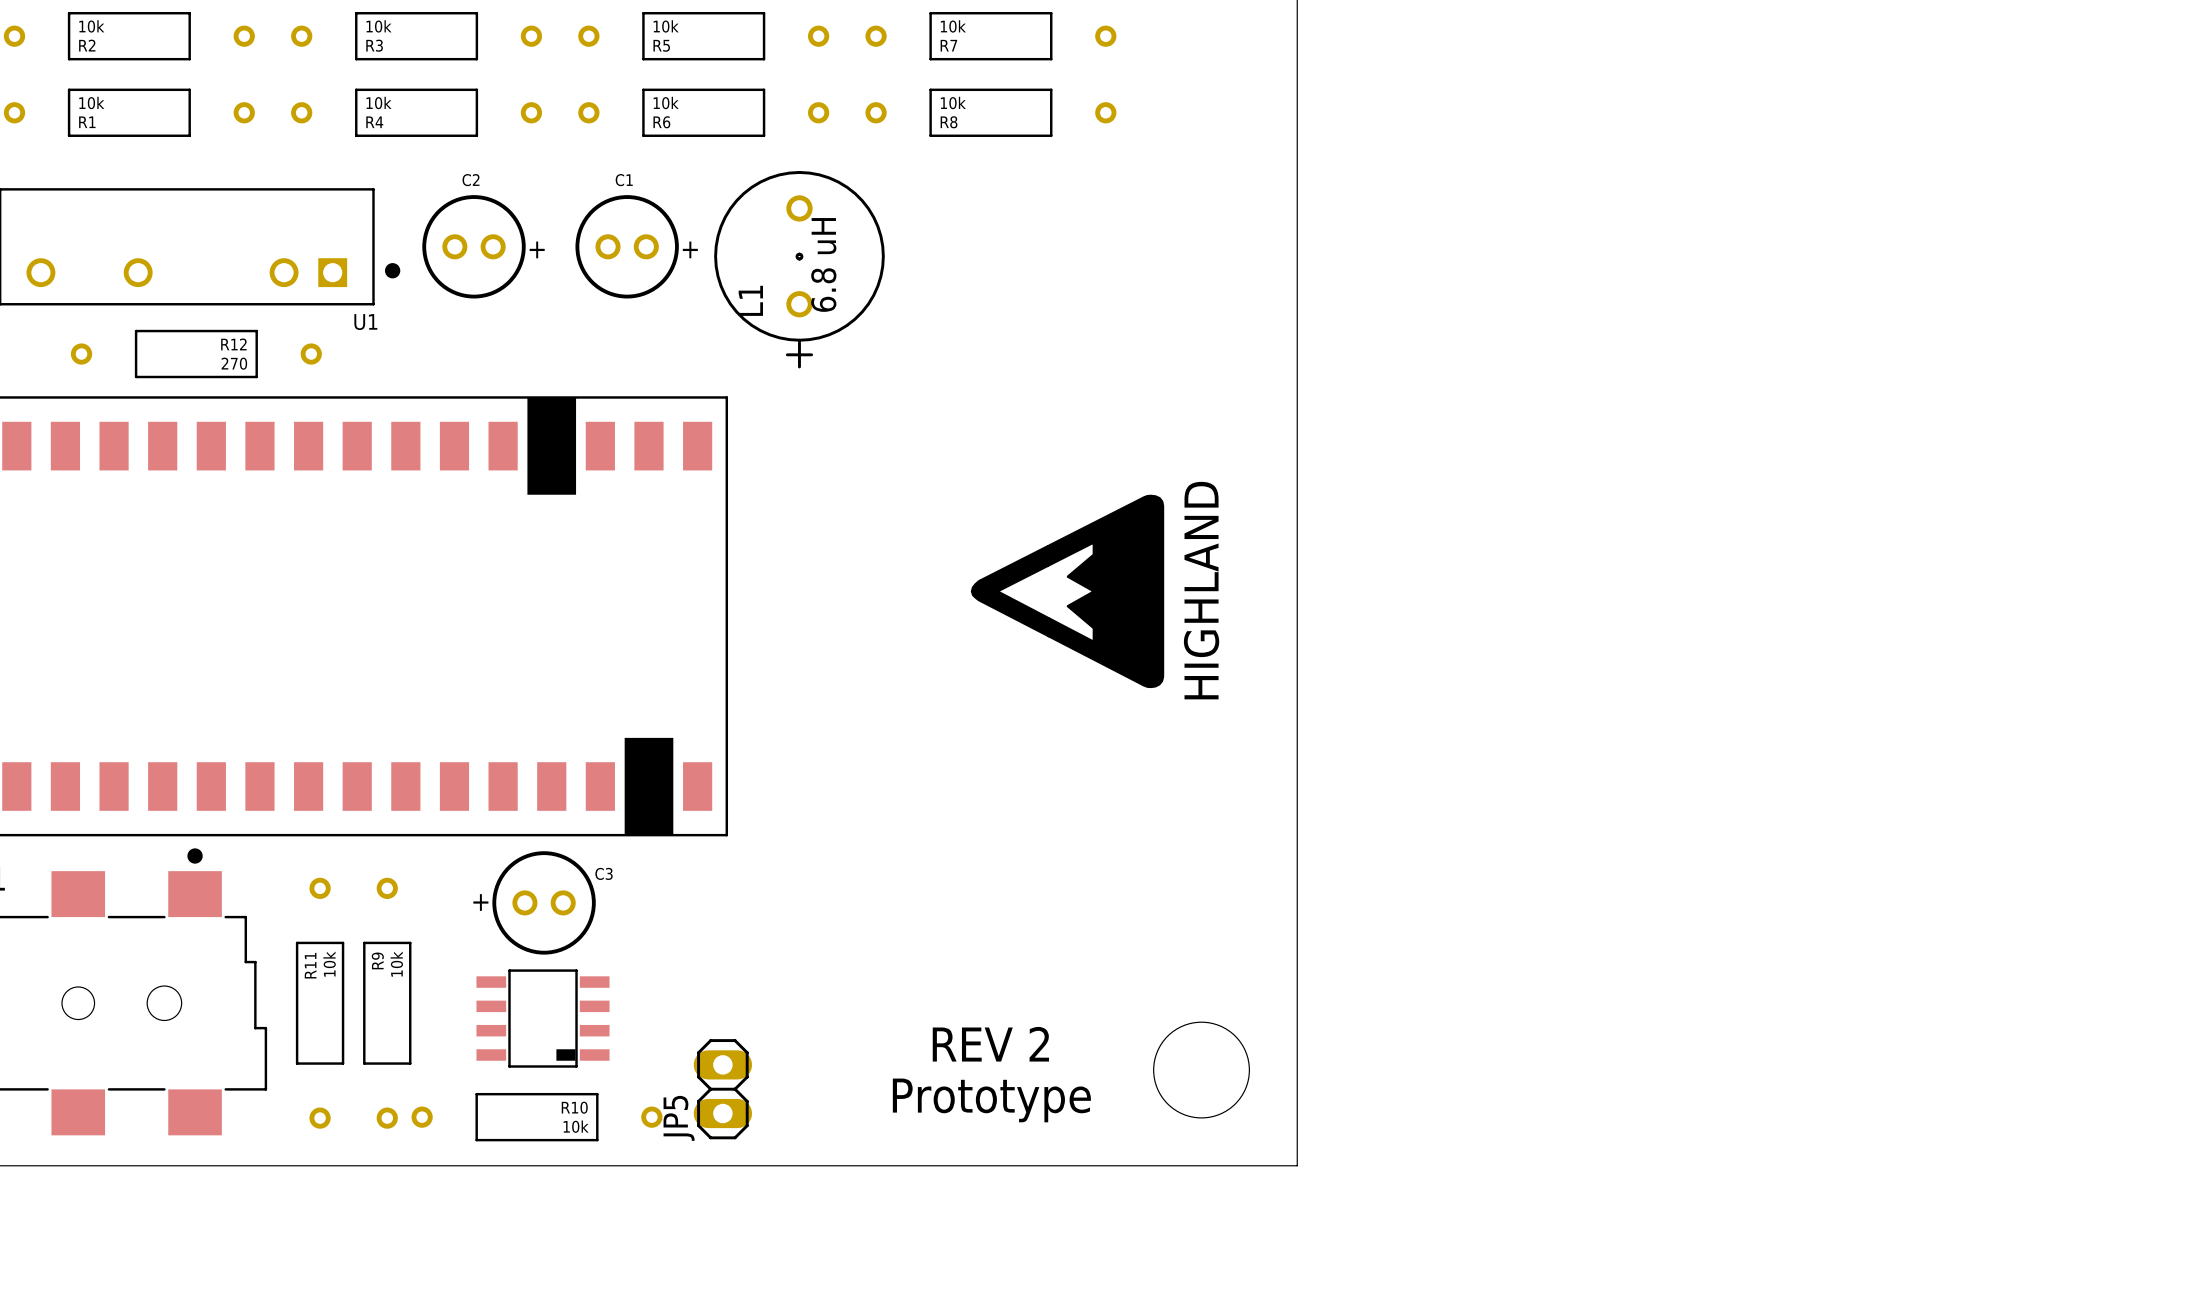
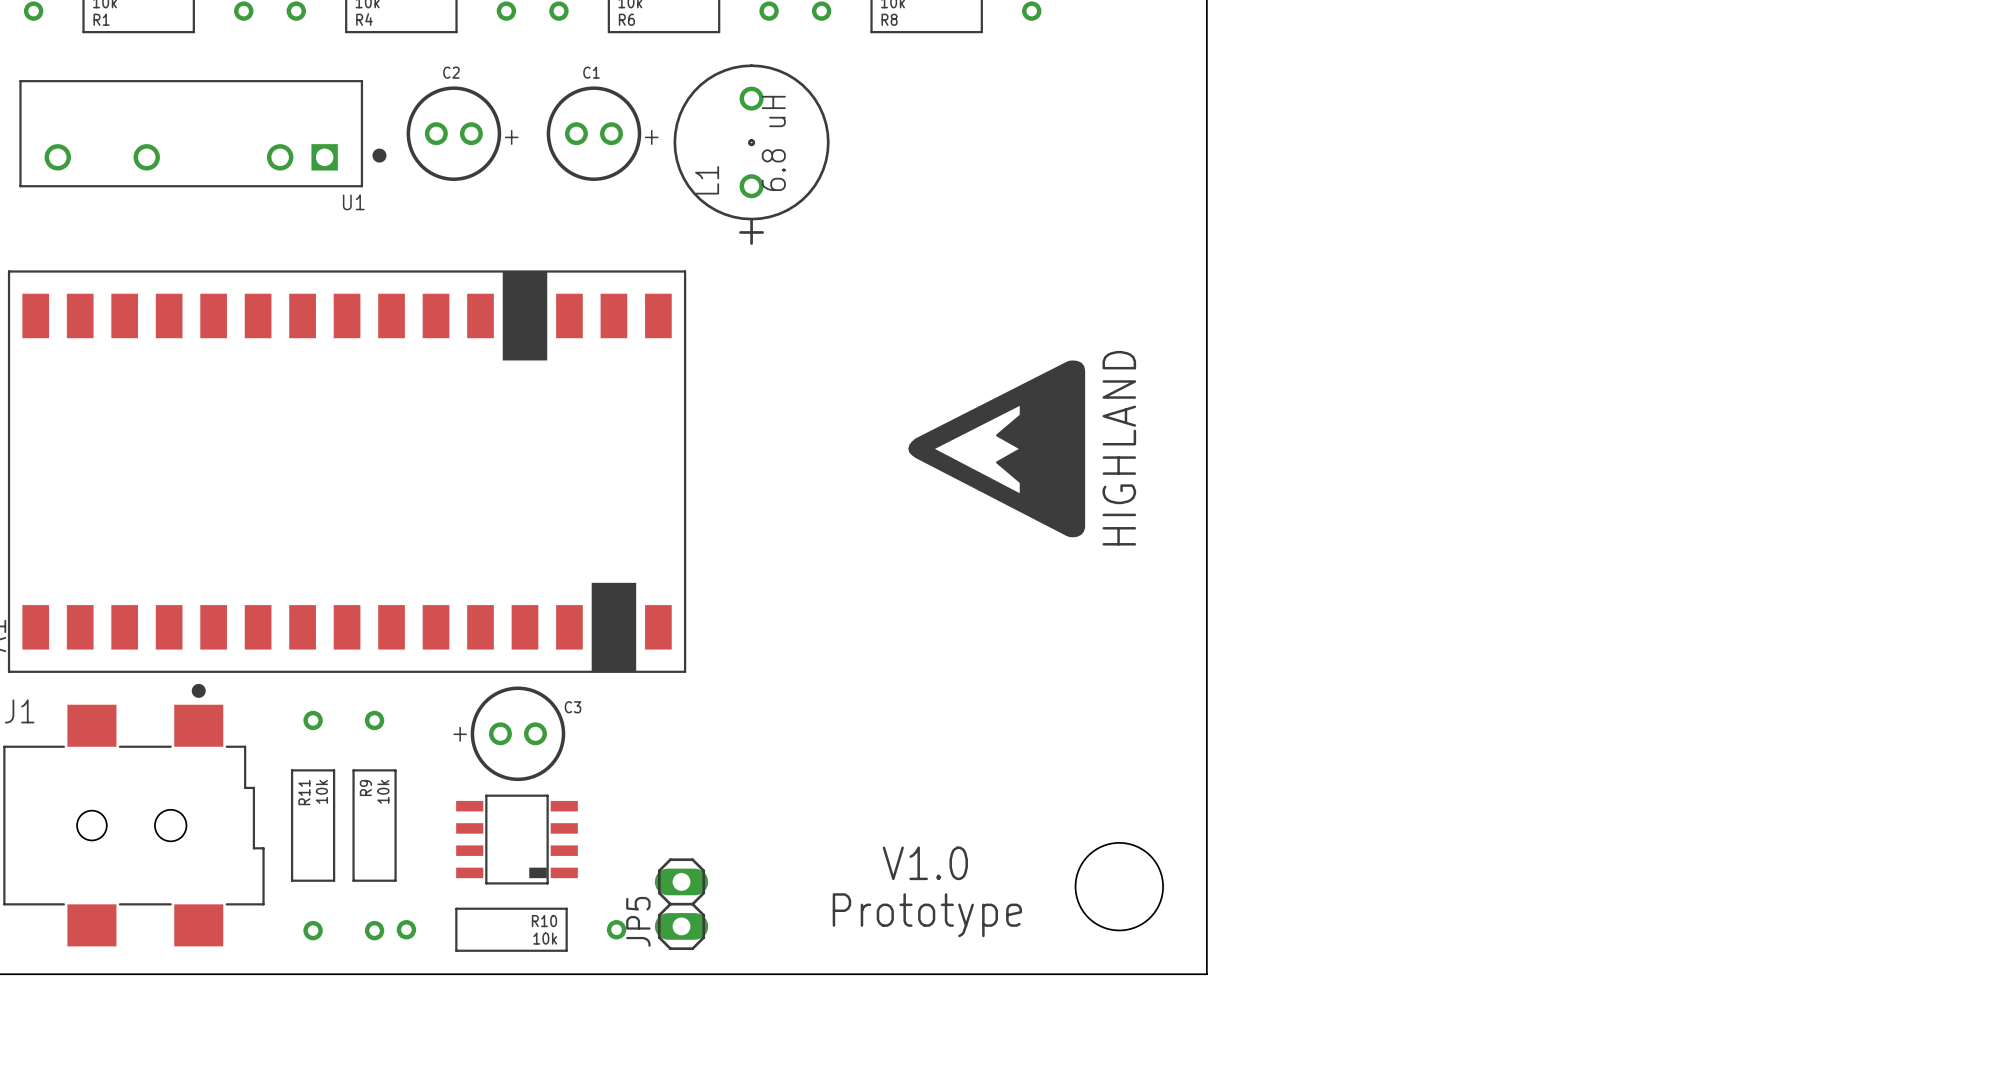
R12: 270 (196, 354) -> none
text: REV 2 (990, 1044) -> V1.0 (925, 863)

